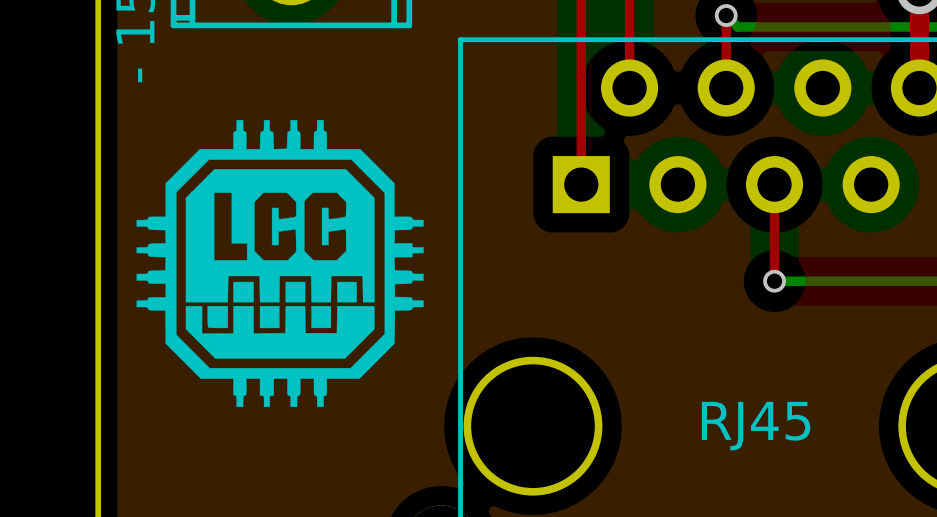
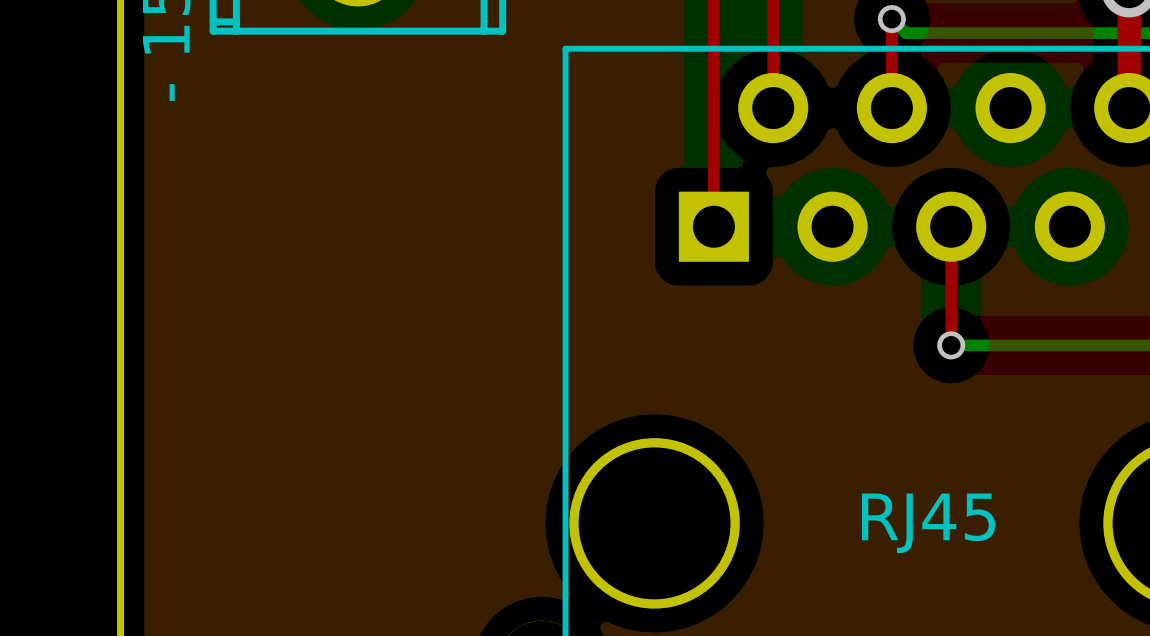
drawing: [136, 120, 424, 408] -> none

